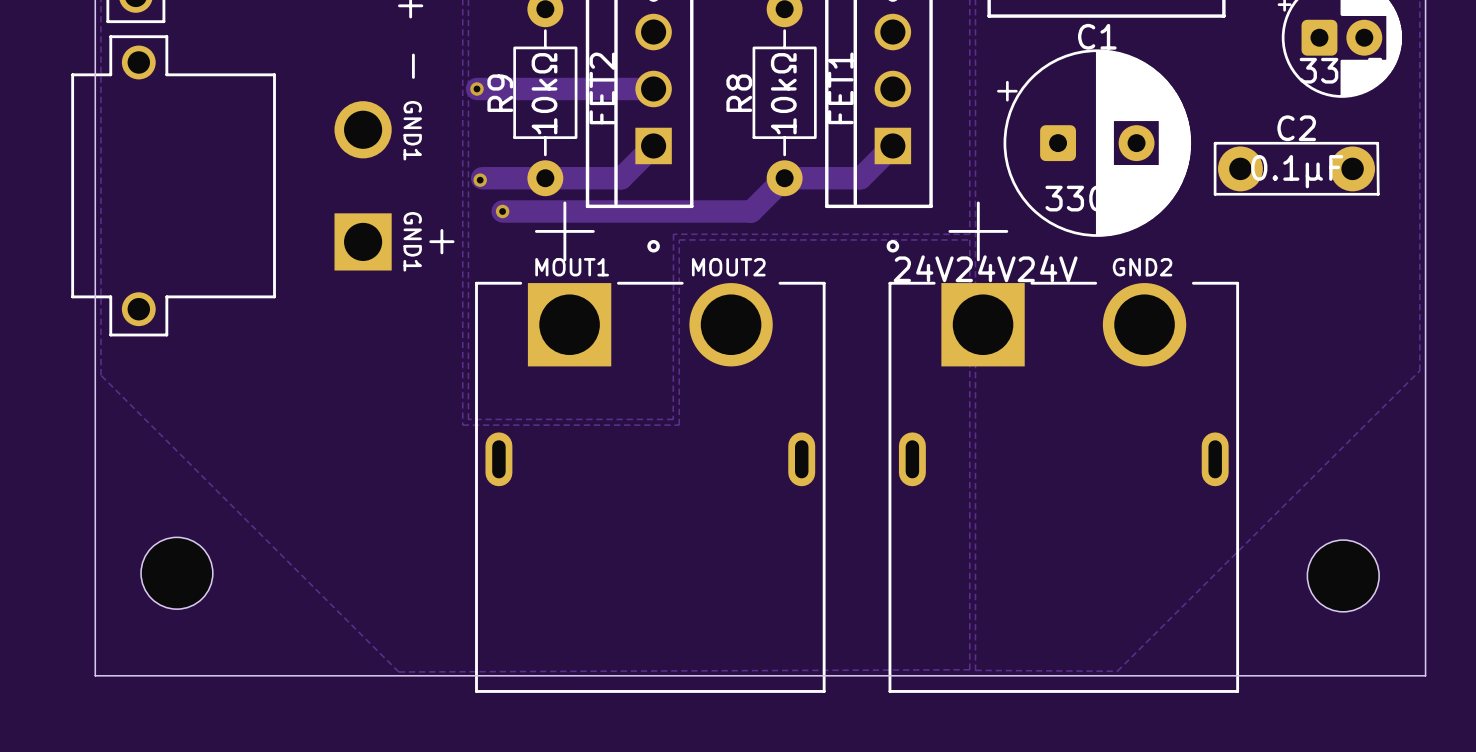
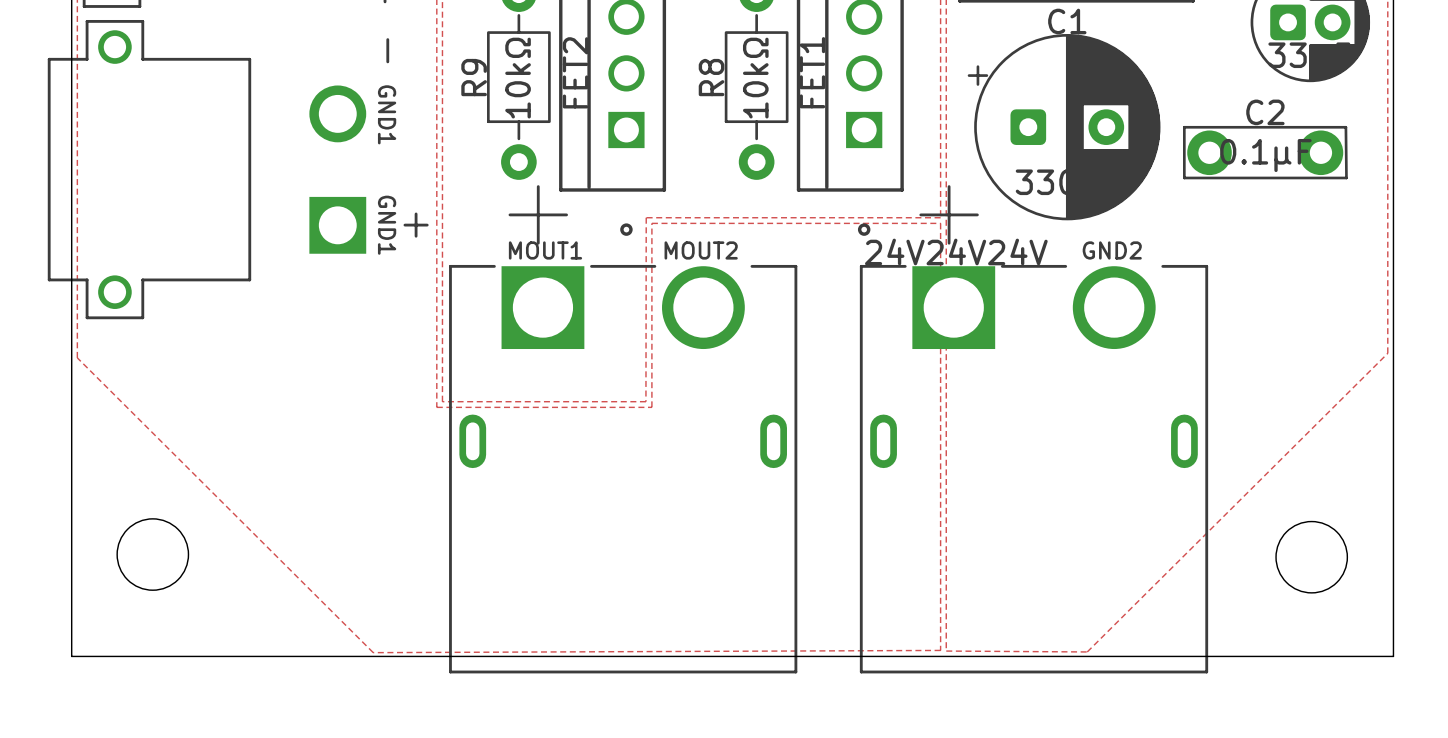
track: (476, 88) (653, 88) -> none
via: (476, 88) -> none
track: (653, 145) (621, 178) (482, 178) (480, 180) -> none
track: (892, 145) (860, 178) (784, 178) (751, 211) (502, 211) -> none
via: (480, 180) -> none
via: (502, 211) -> none

